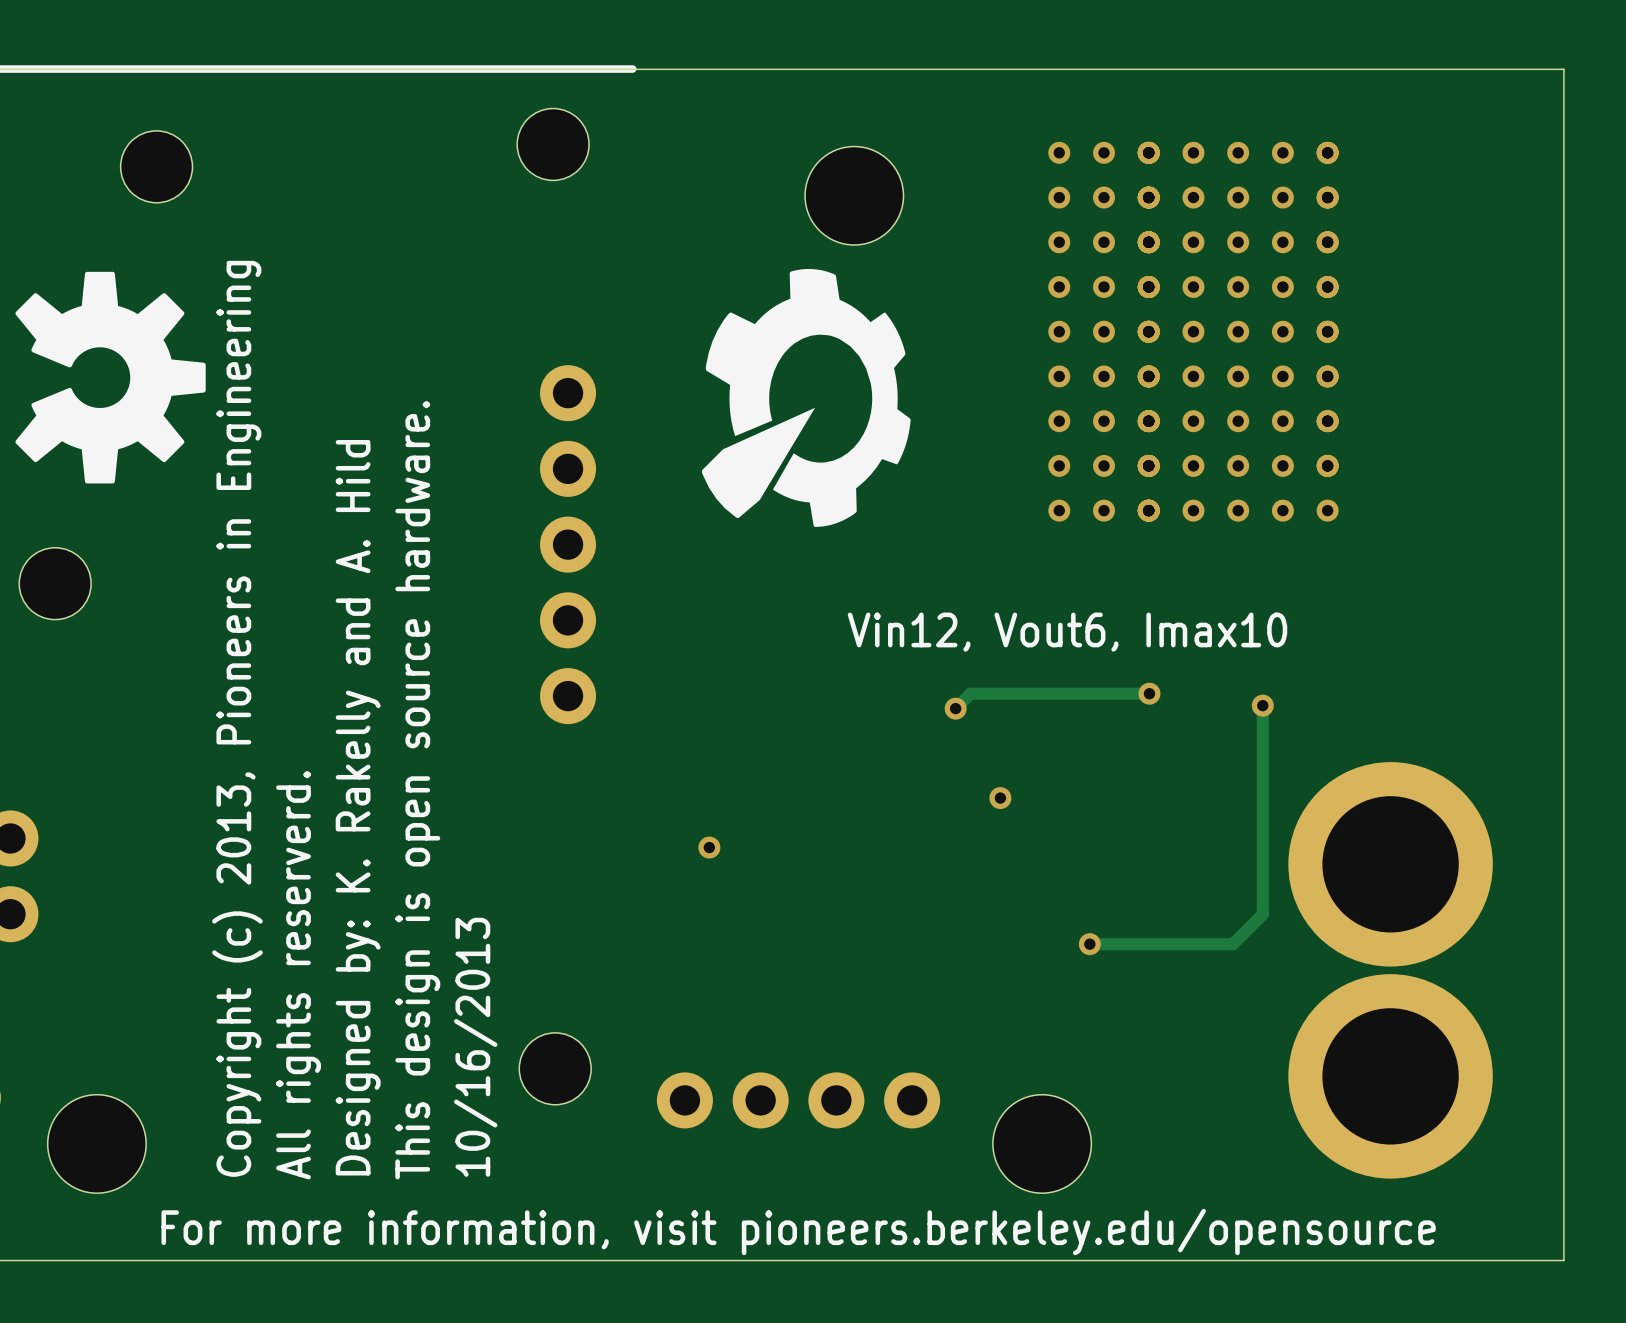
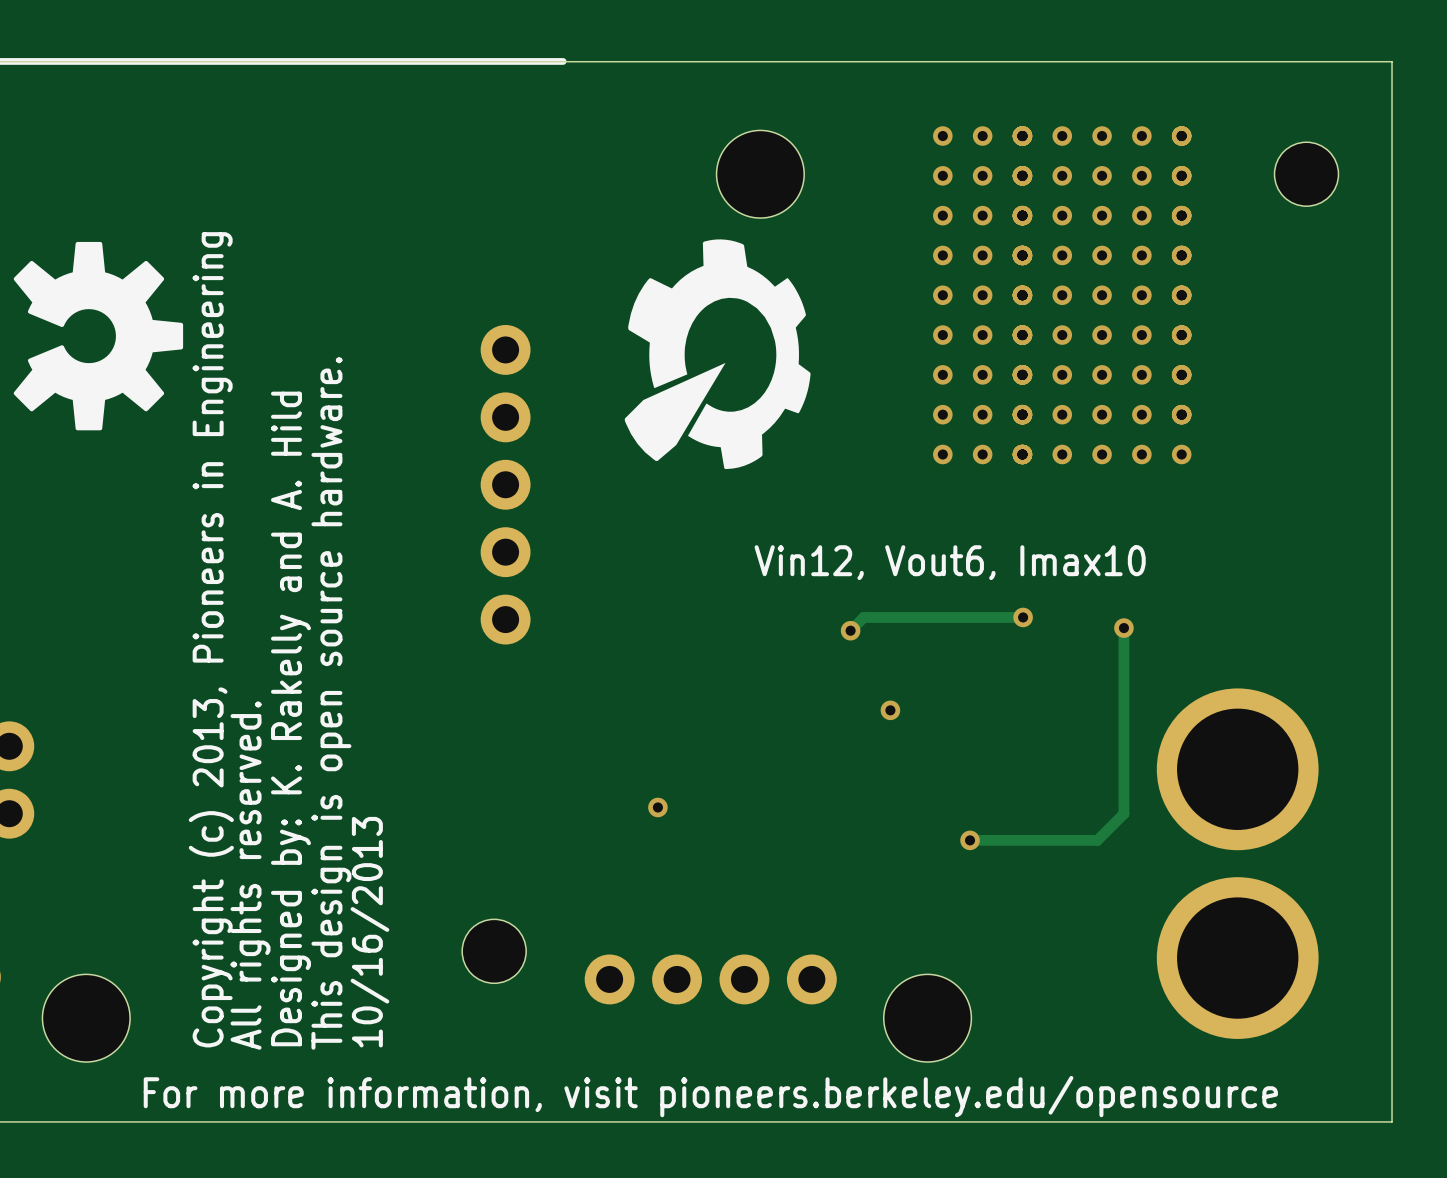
part: (553, 144) -> none
part: (156, 166) -> none
part: none -> (1306, 174)
part: (55, 583) -> none
part footprint: [1288, 762, 1493, 1179] -> [1156, 688, 1319, 1039]
text: This design is open source hardware. (417, 790) -> none
text: none -> Designed by: K. Rakelly and A. Hild (290, 718)
text: Designed by: K. Rakelly and A. Hild (358, 807) -> This design is open source hardware. (331, 703)
via position: (709, 847) -> (657, 807)
text: All rights reserverd. (298, 975) -> All rights reserved. (250, 875)
text position: 10/16/2013 (475, 1047) -> 10/16/2013 (369, 932)

